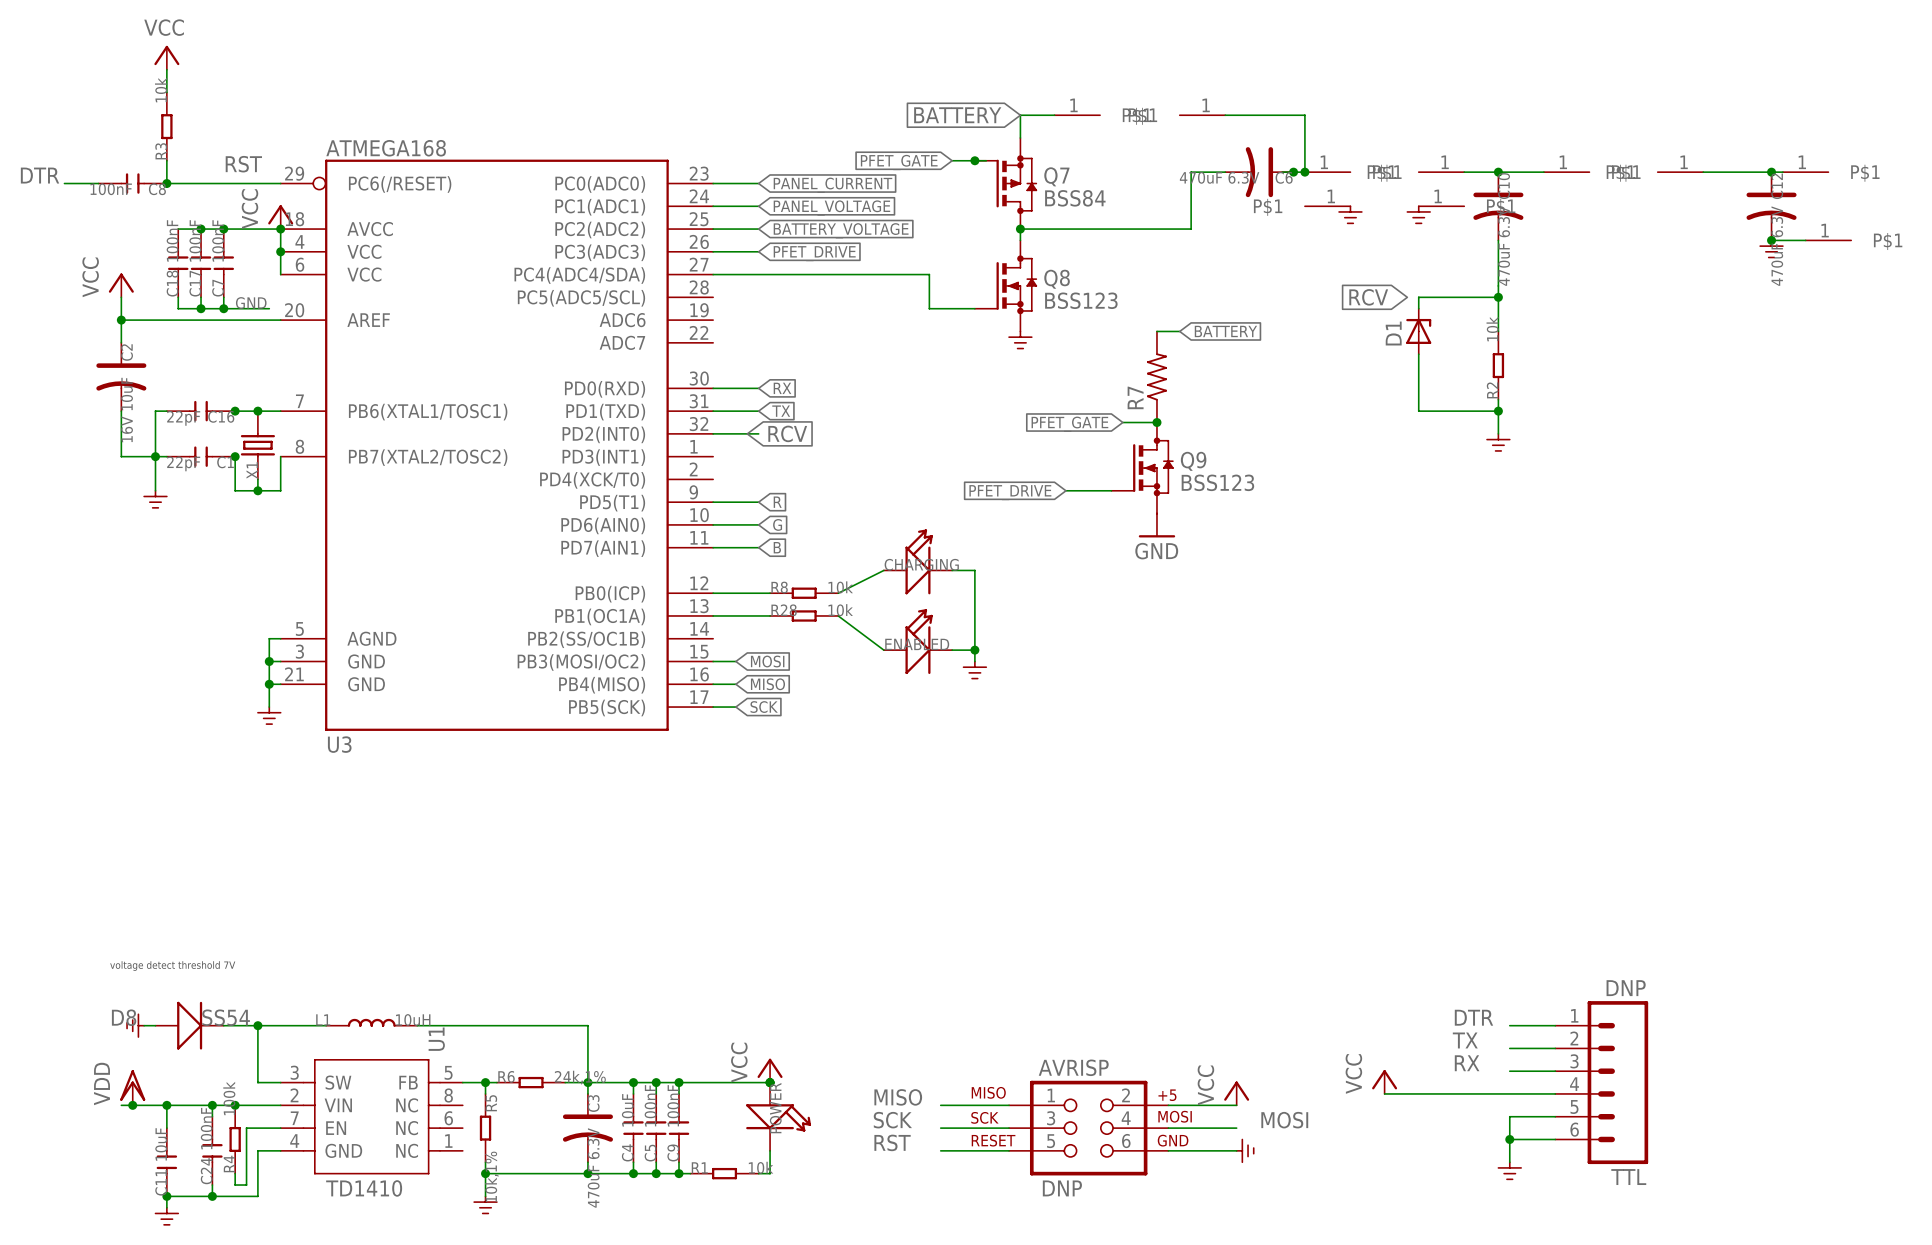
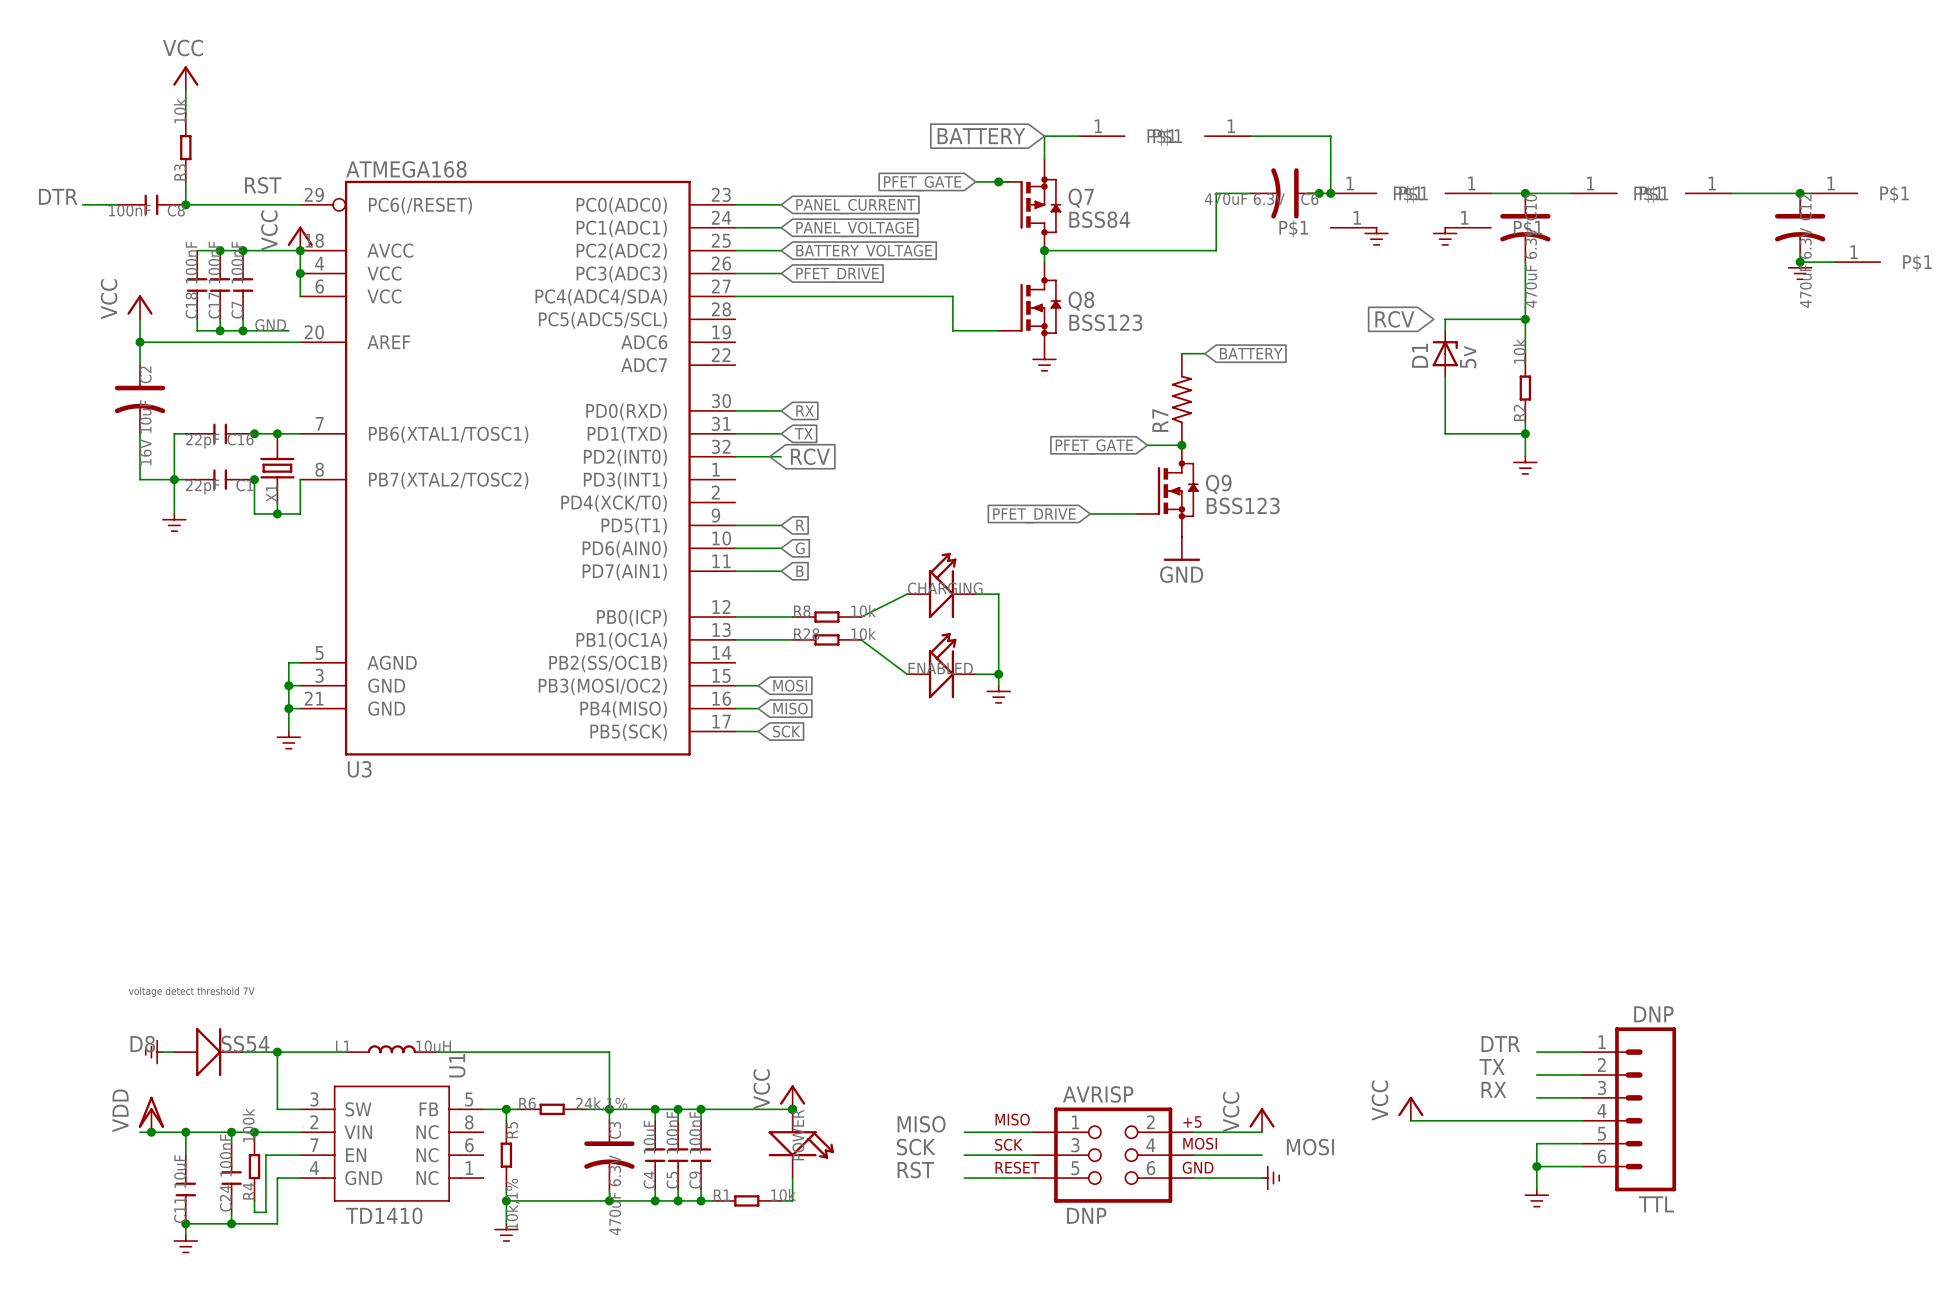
D1 value: none -> 5v (1468, 357)

